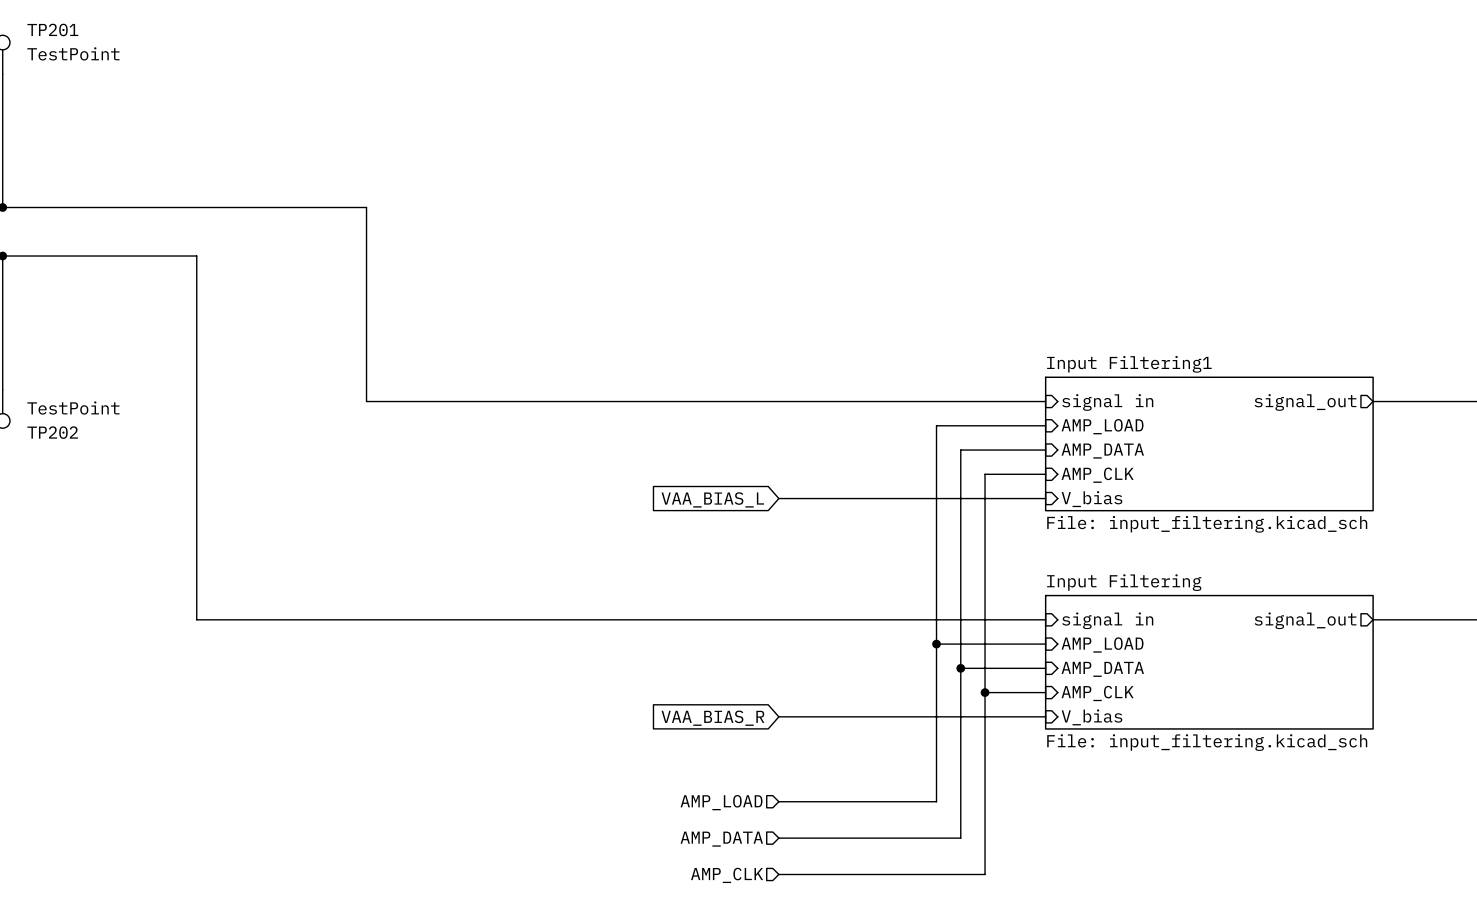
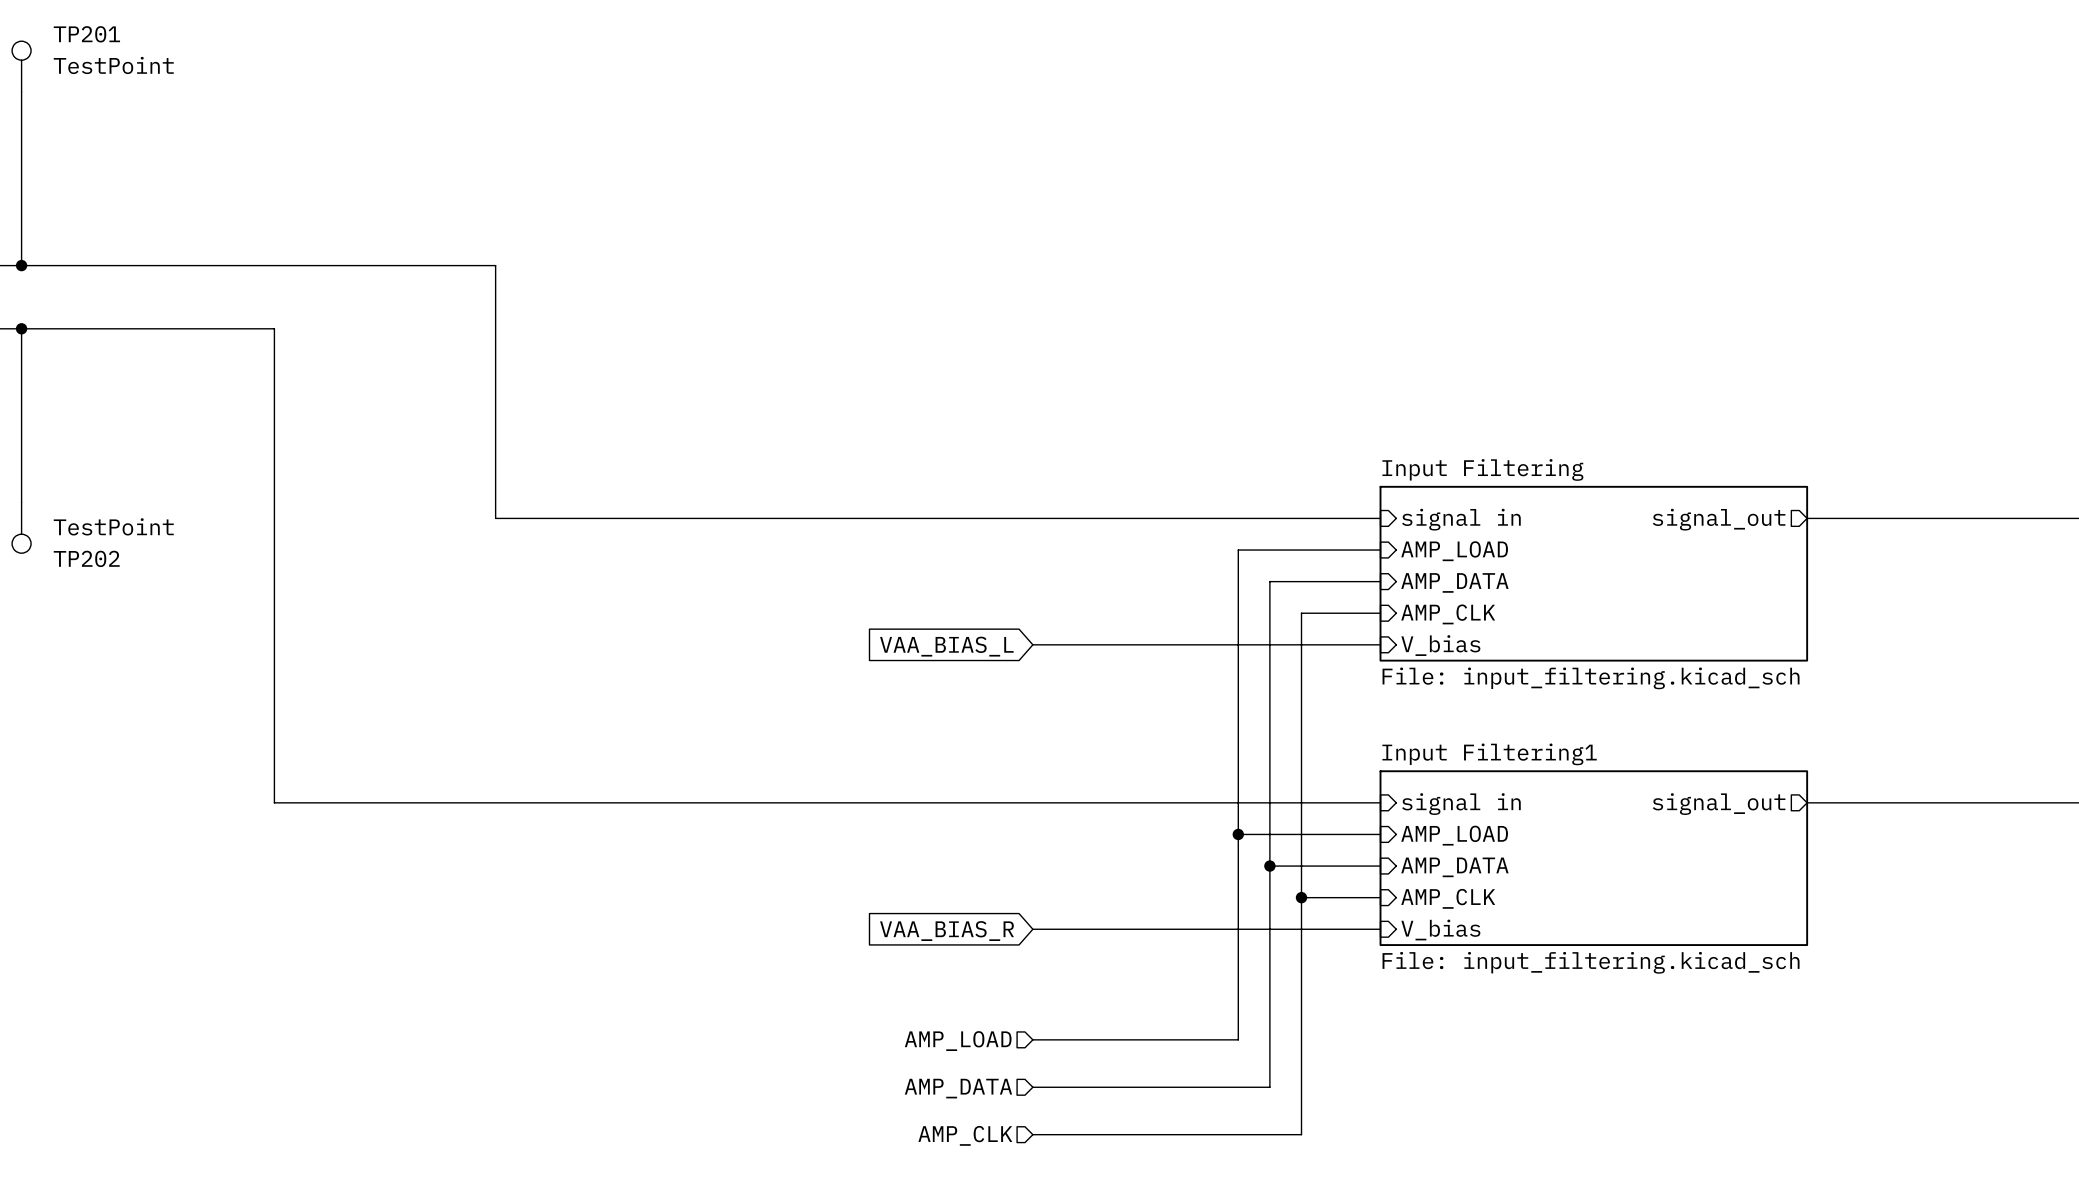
sheet Input Filtering1 name: Input Filtering1 (1129, 364) -> Input Filtering (1482, 469)
sheet Input Filtering name: Input Filtering (1124, 582) -> Input Filtering1 (1489, 754)

